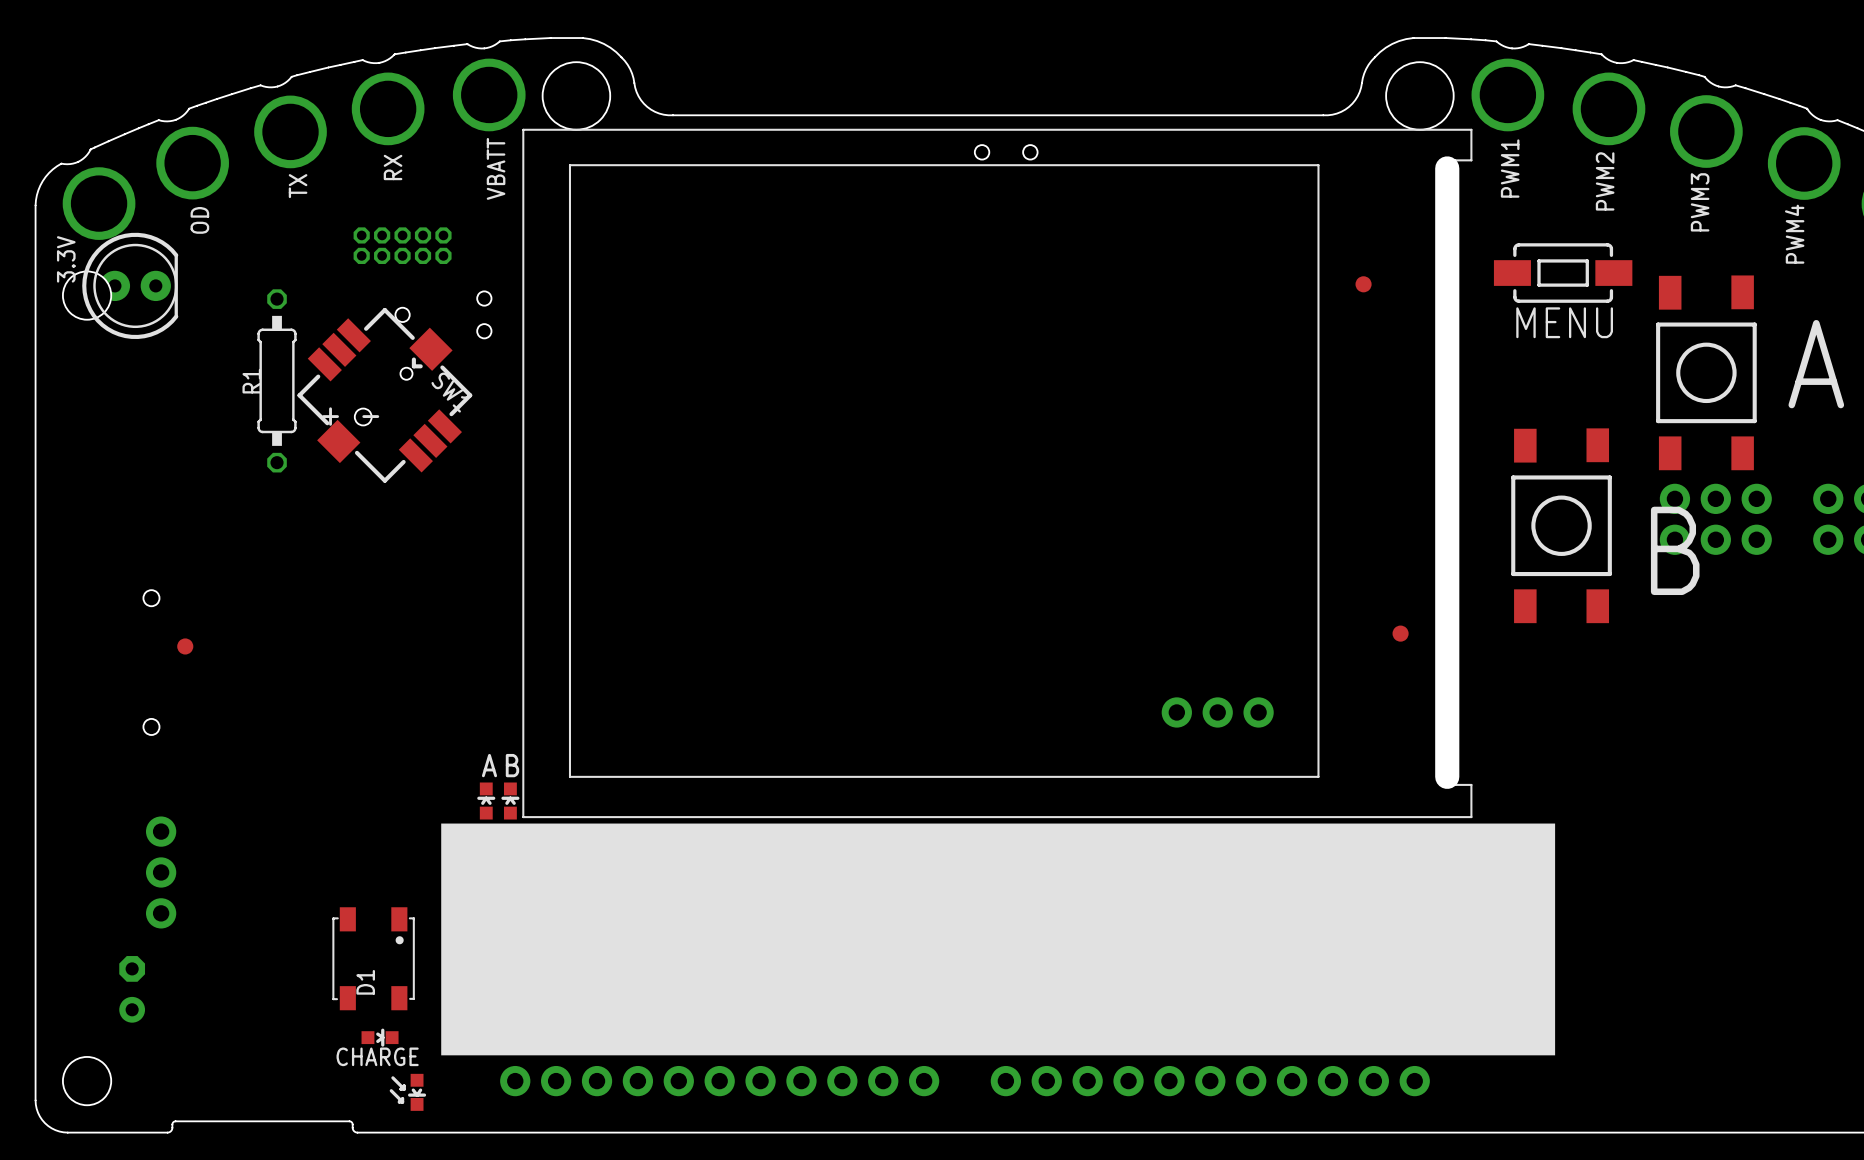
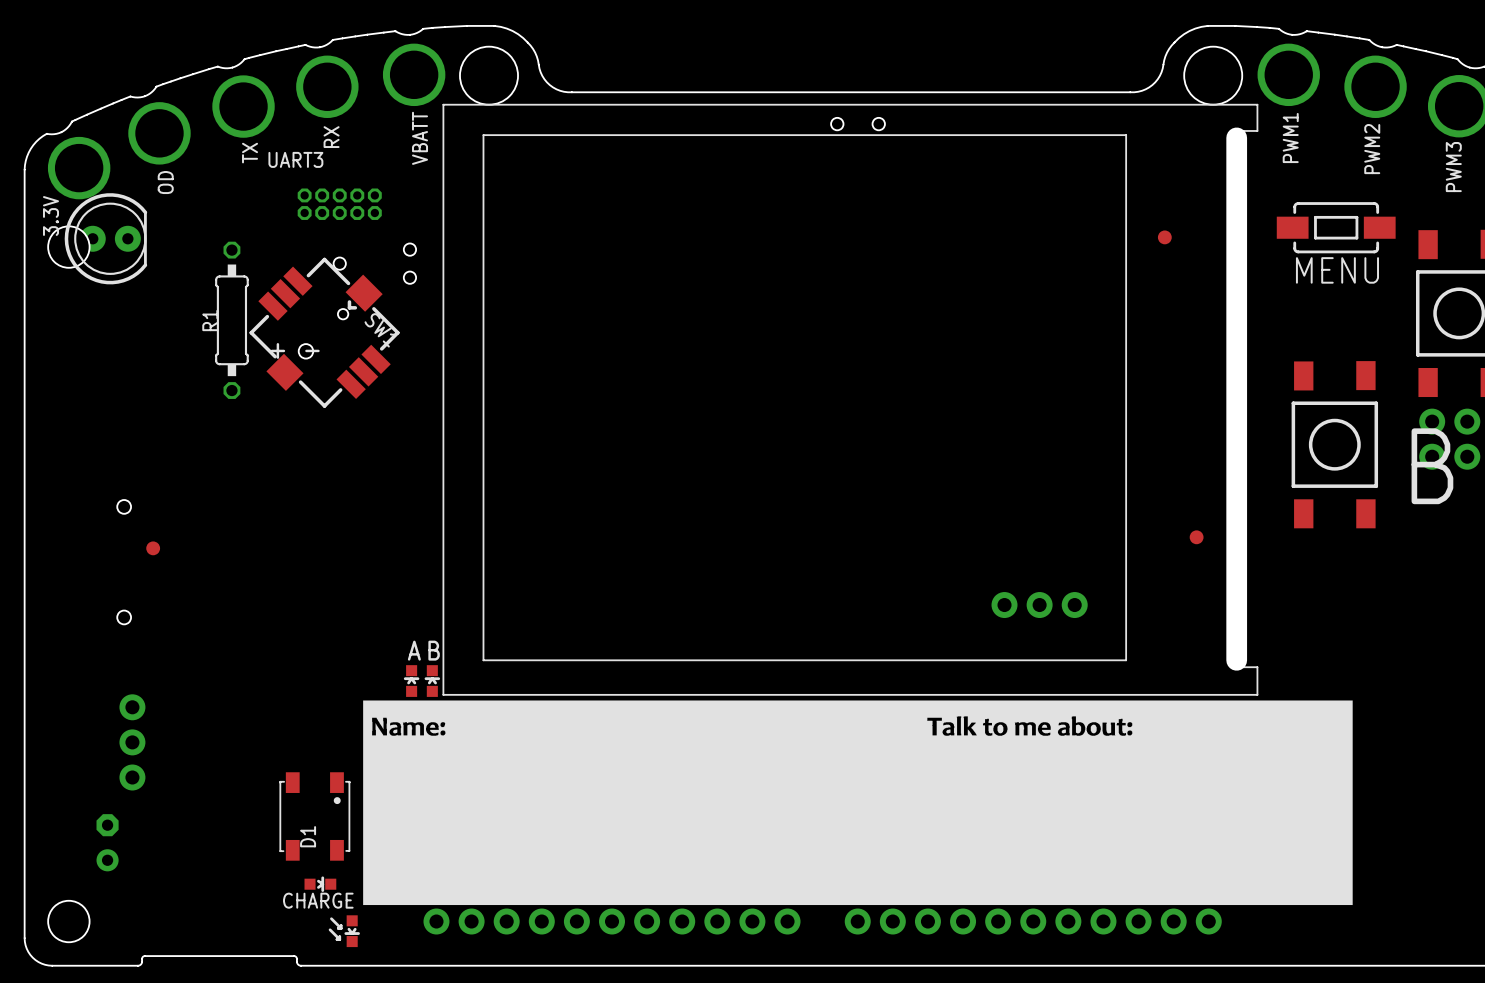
text: none -> UART3 (295, 159)
drawing shape: [441, 823, 1556, 1056] -> [363, 700, 1353, 906]

